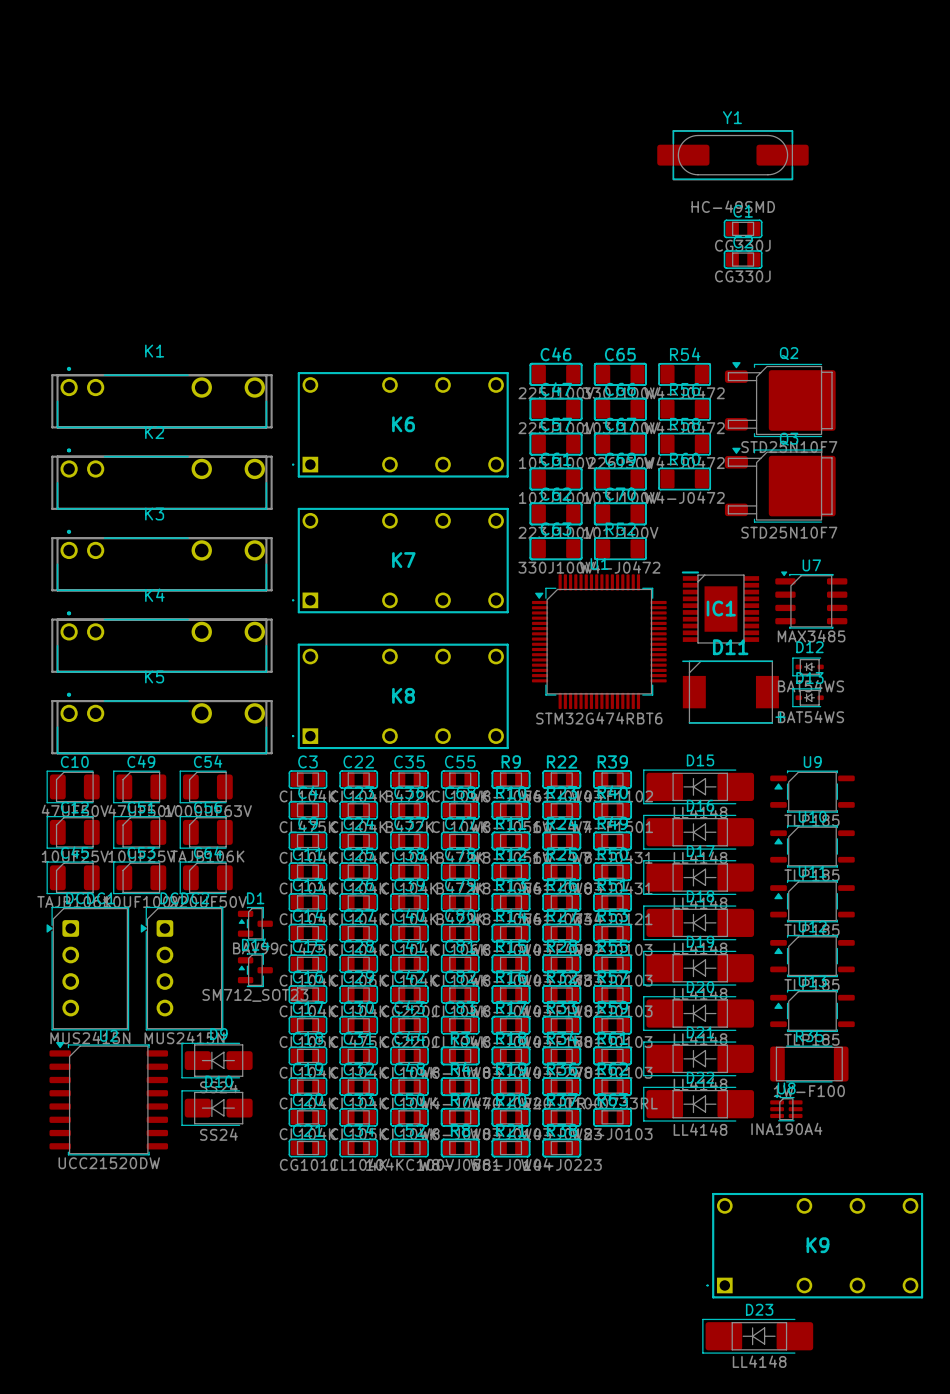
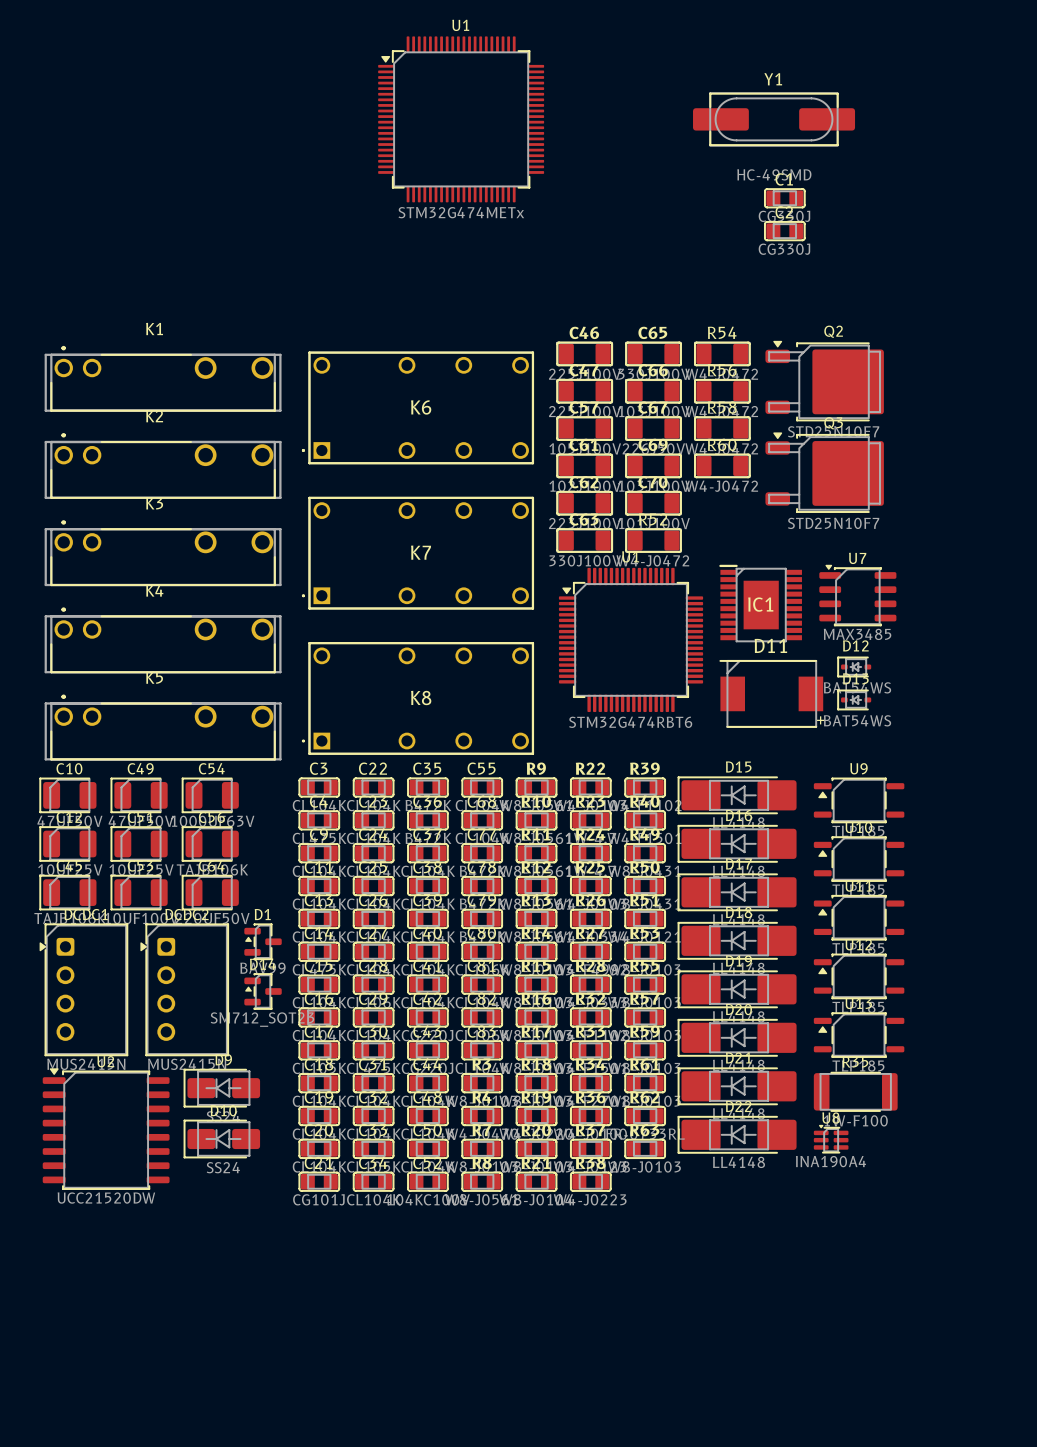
U1: none -> STM32G474METx (461, 119)
K9: (814, 1245) -> none
D23: LL4148 (757, 1336) -> none

